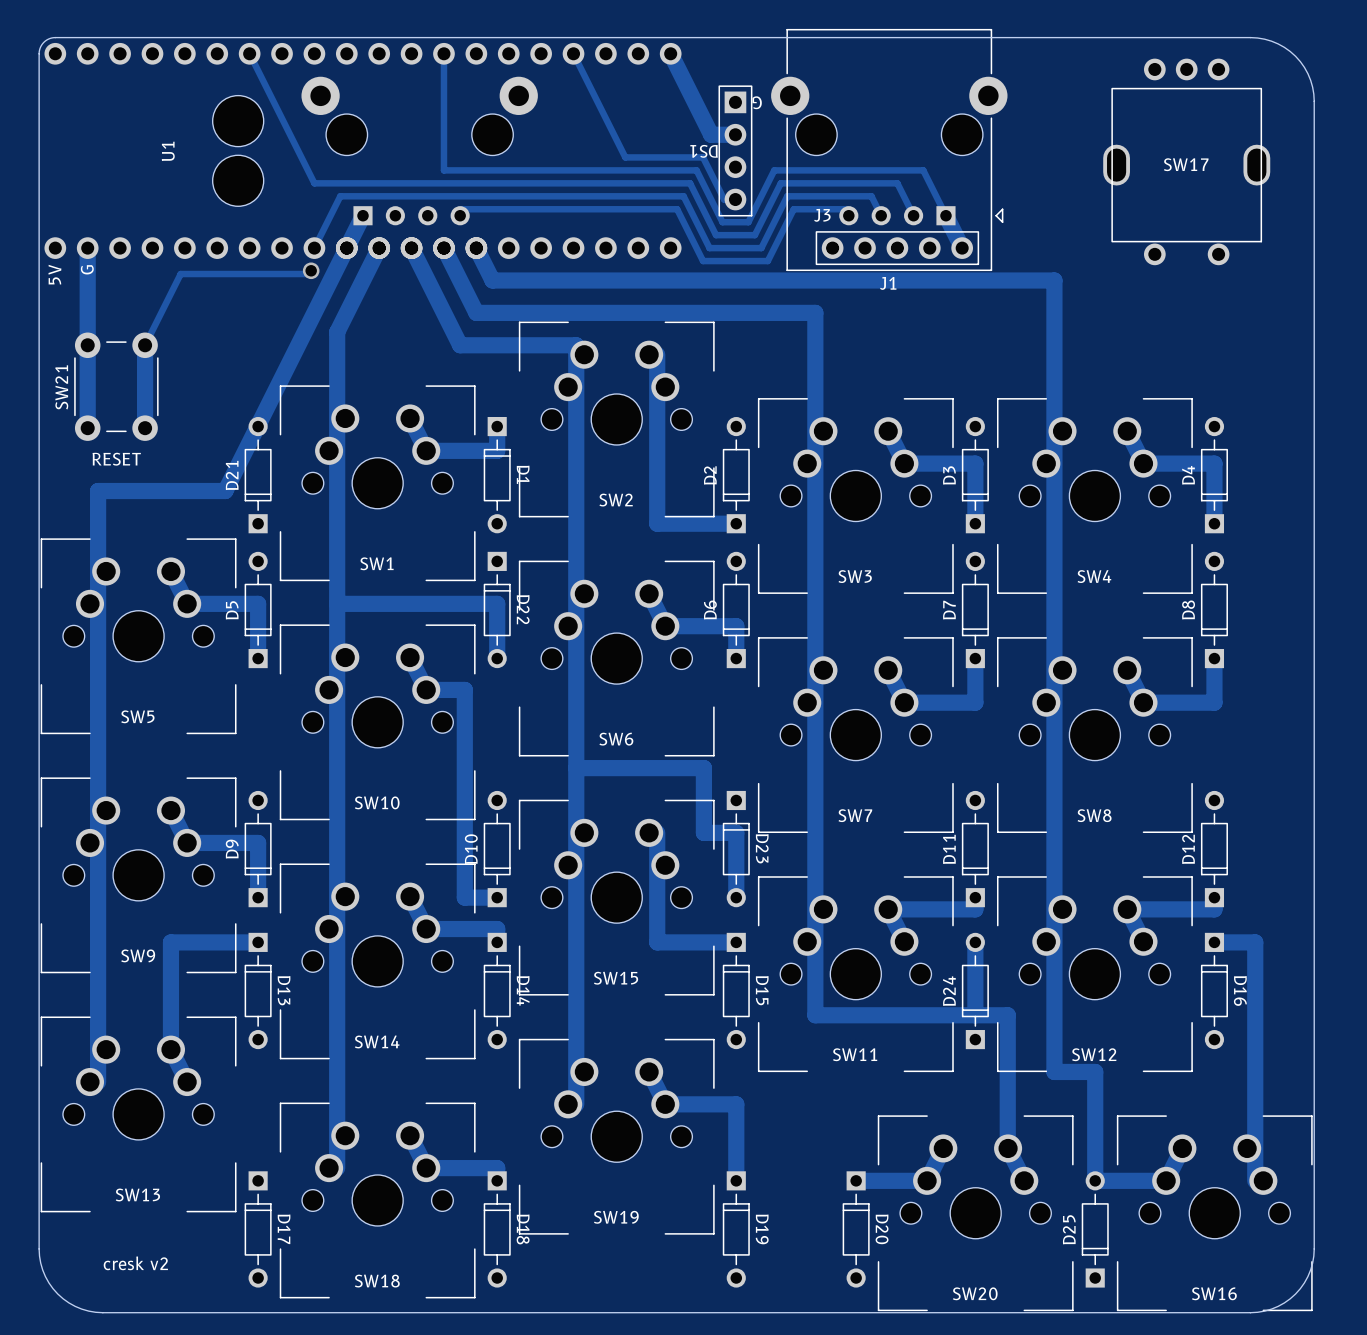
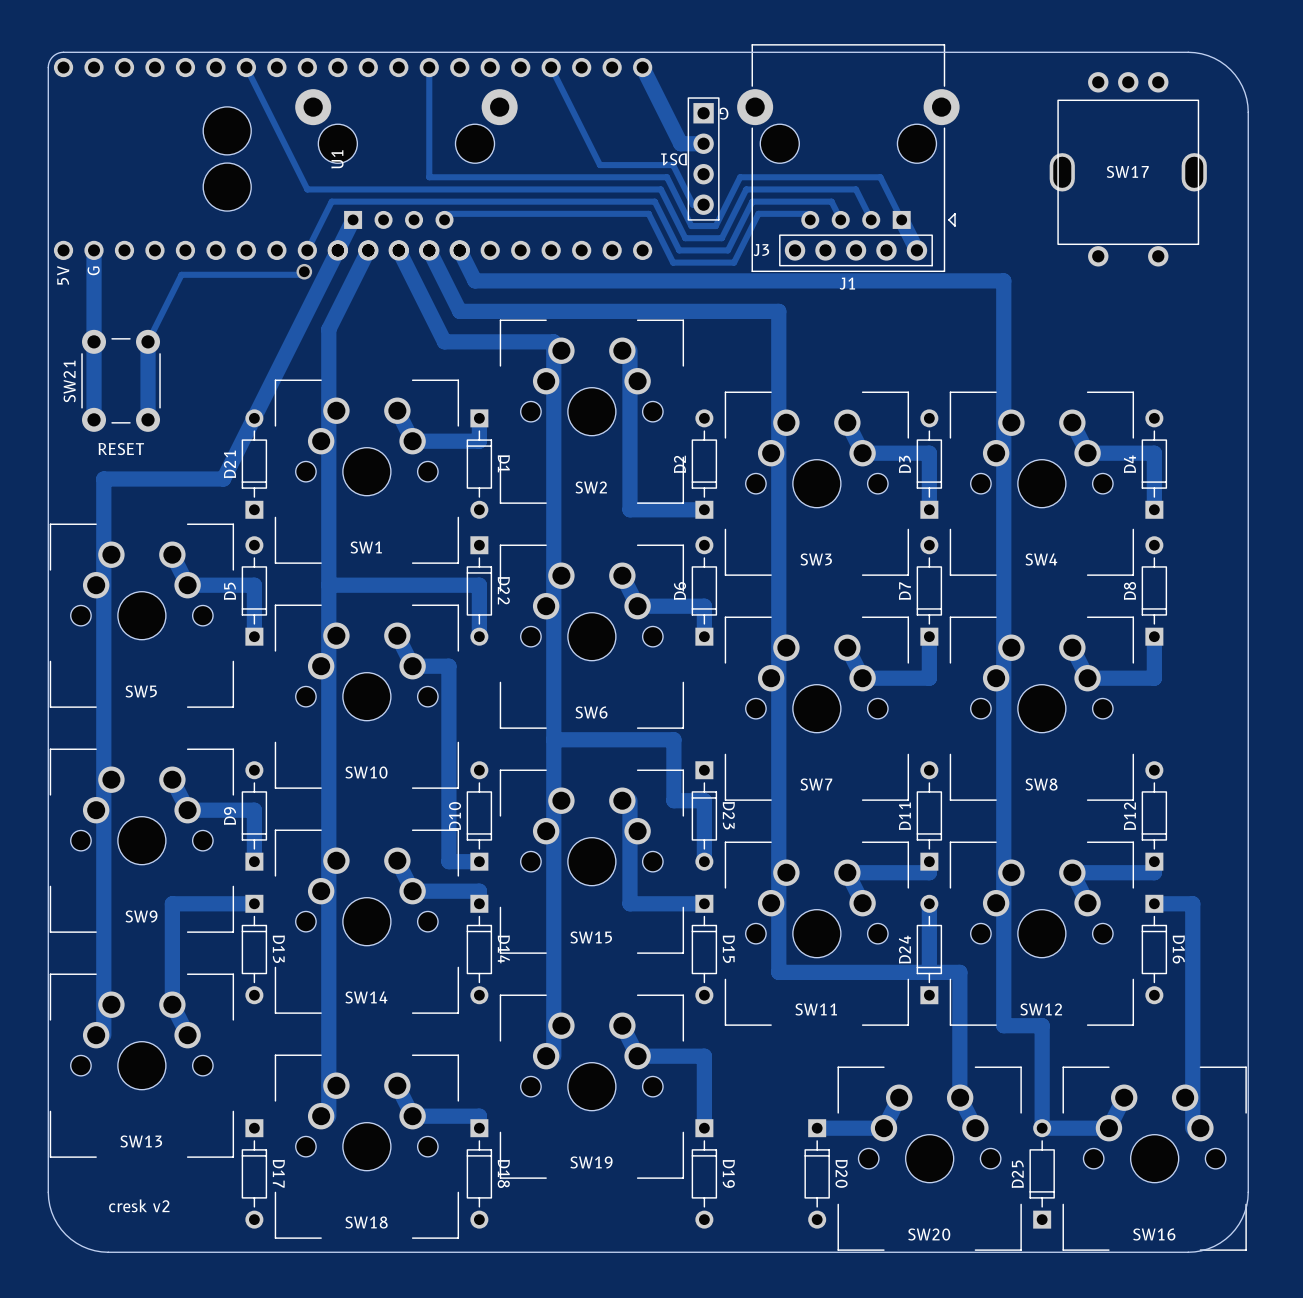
U1 footprint: [44, 42, 682, 259] -> [53, 57, 653, 261]
U1 name position: U1 (168, 151) -> U1 (337, 159)
J3 name position: J3 (822, 215) -> J3 (761, 250)

